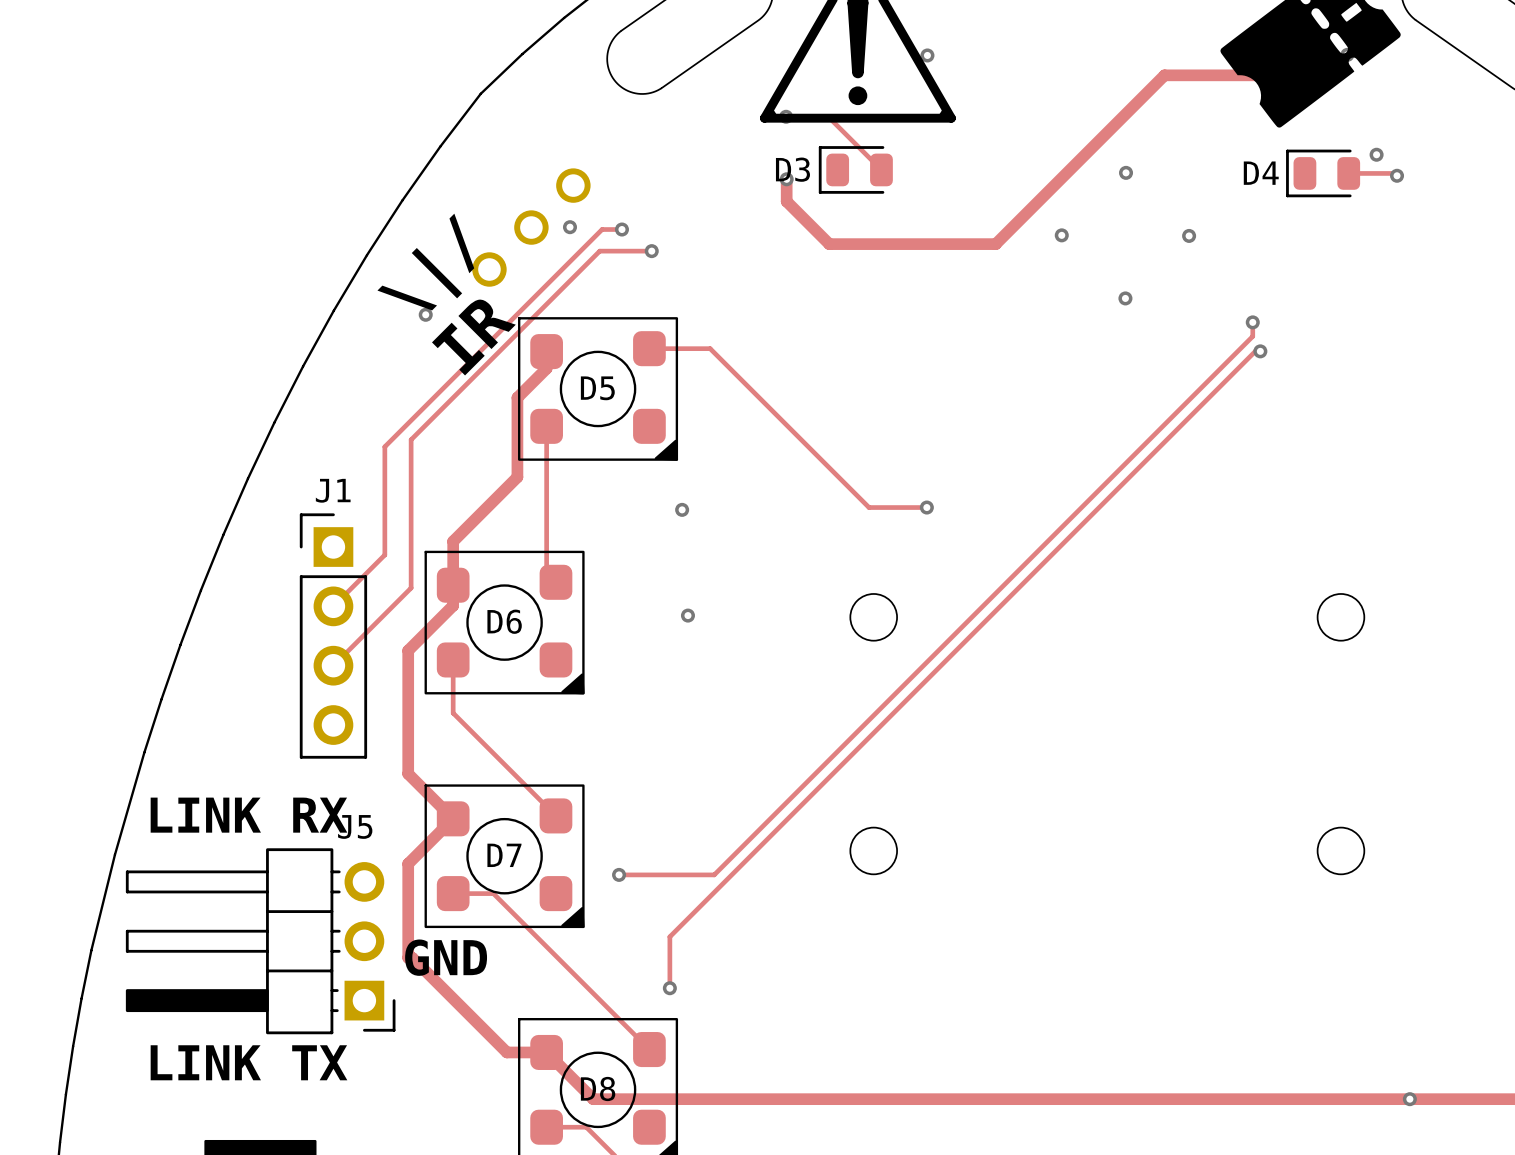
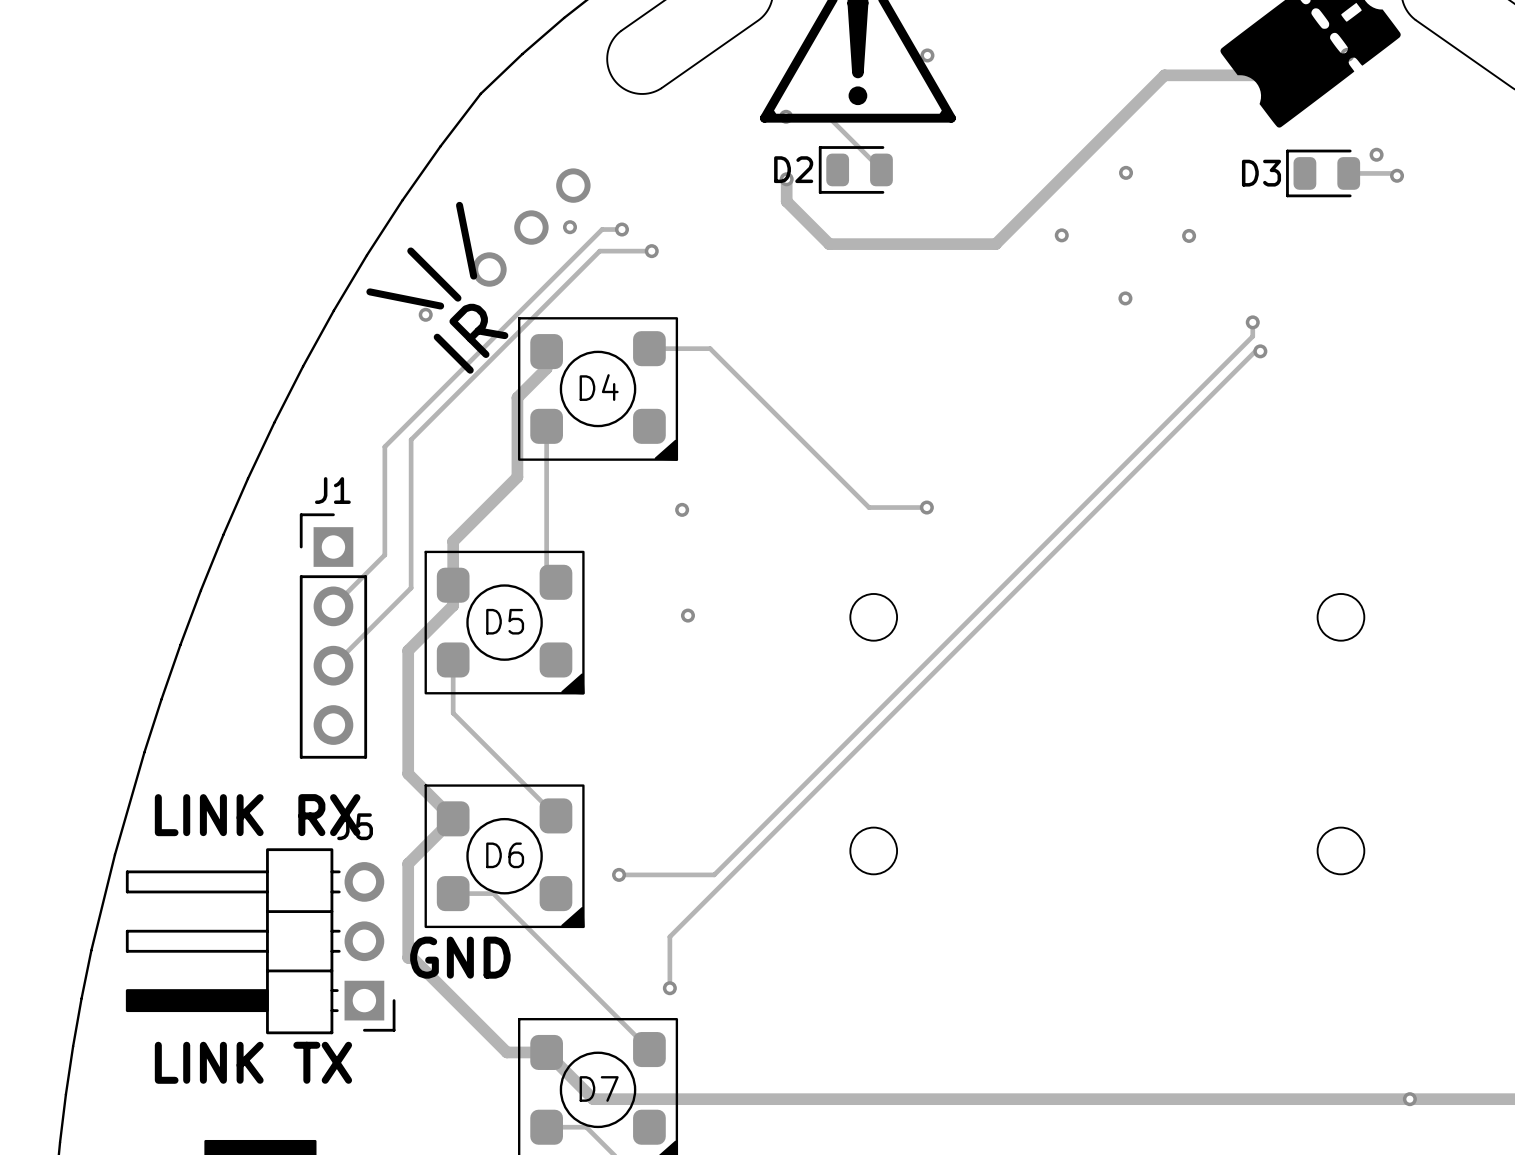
D3 name: D3 (792, 169) -> D2 (793, 169)
D4 name: D4 (1261, 173) -> D3 (1261, 173)
D5 name: D5 (597, 388) -> D4 (599, 387)
D6 name: D6 (504, 621) -> D5 (505, 621)
D7 name: D7 (504, 855) -> D6 (505, 855)
D8 name: D8 (598, 1088) -> D7 (599, 1088)

